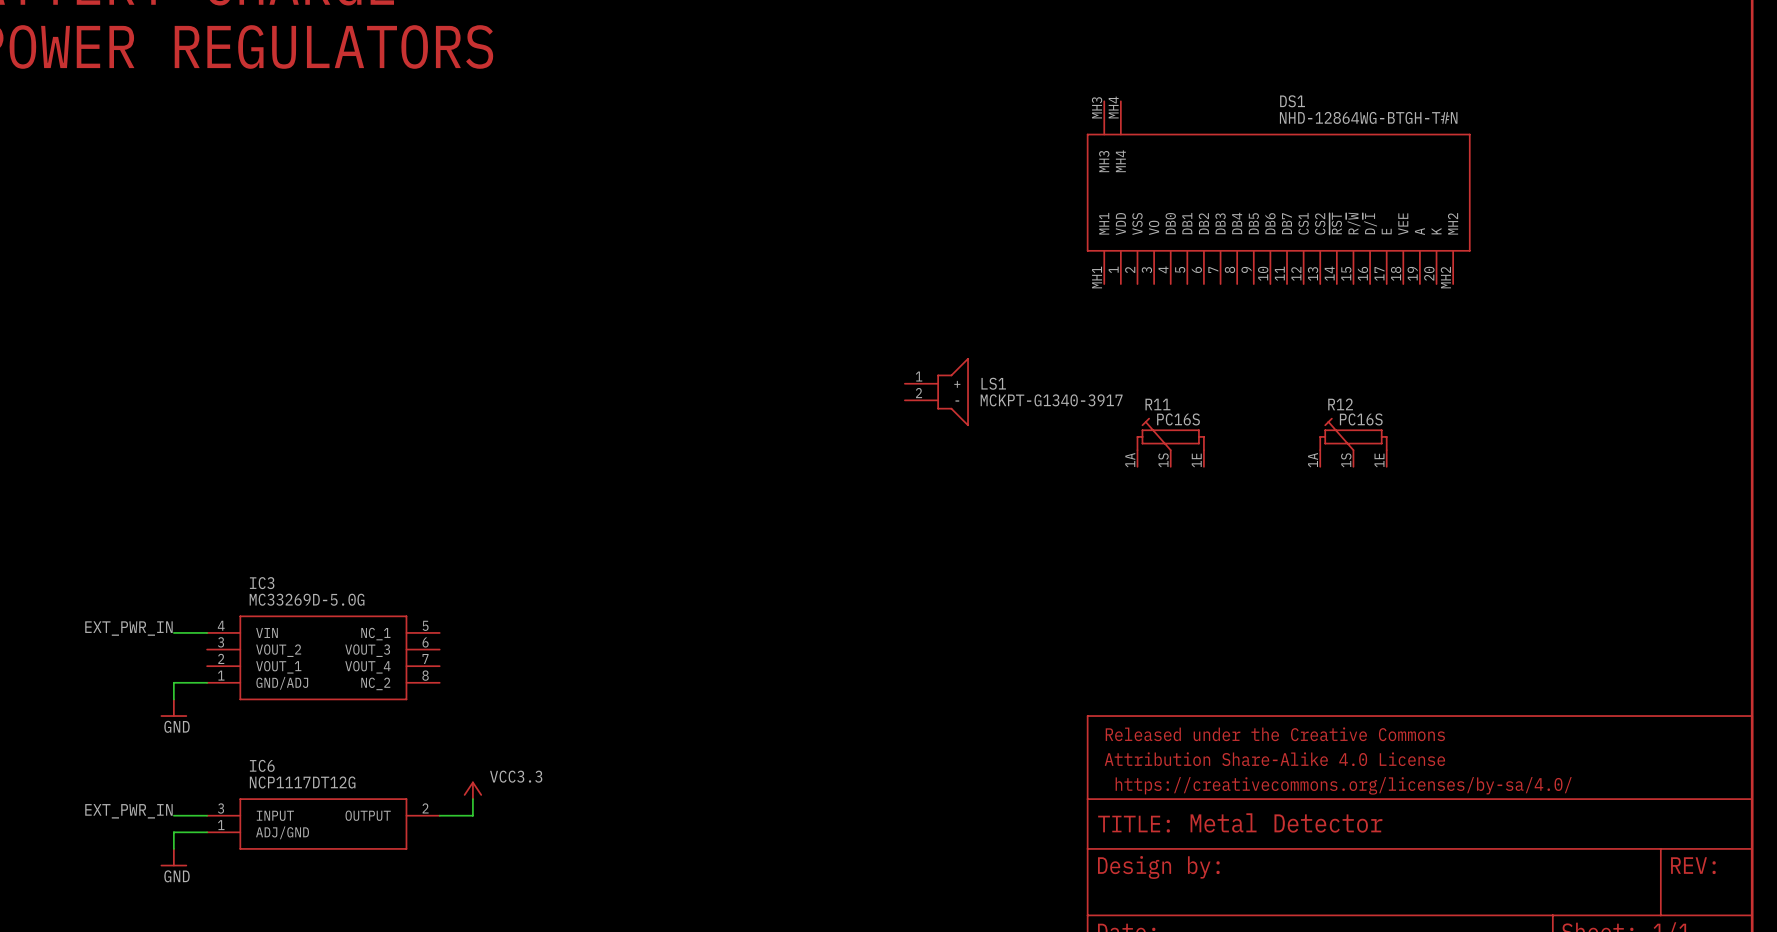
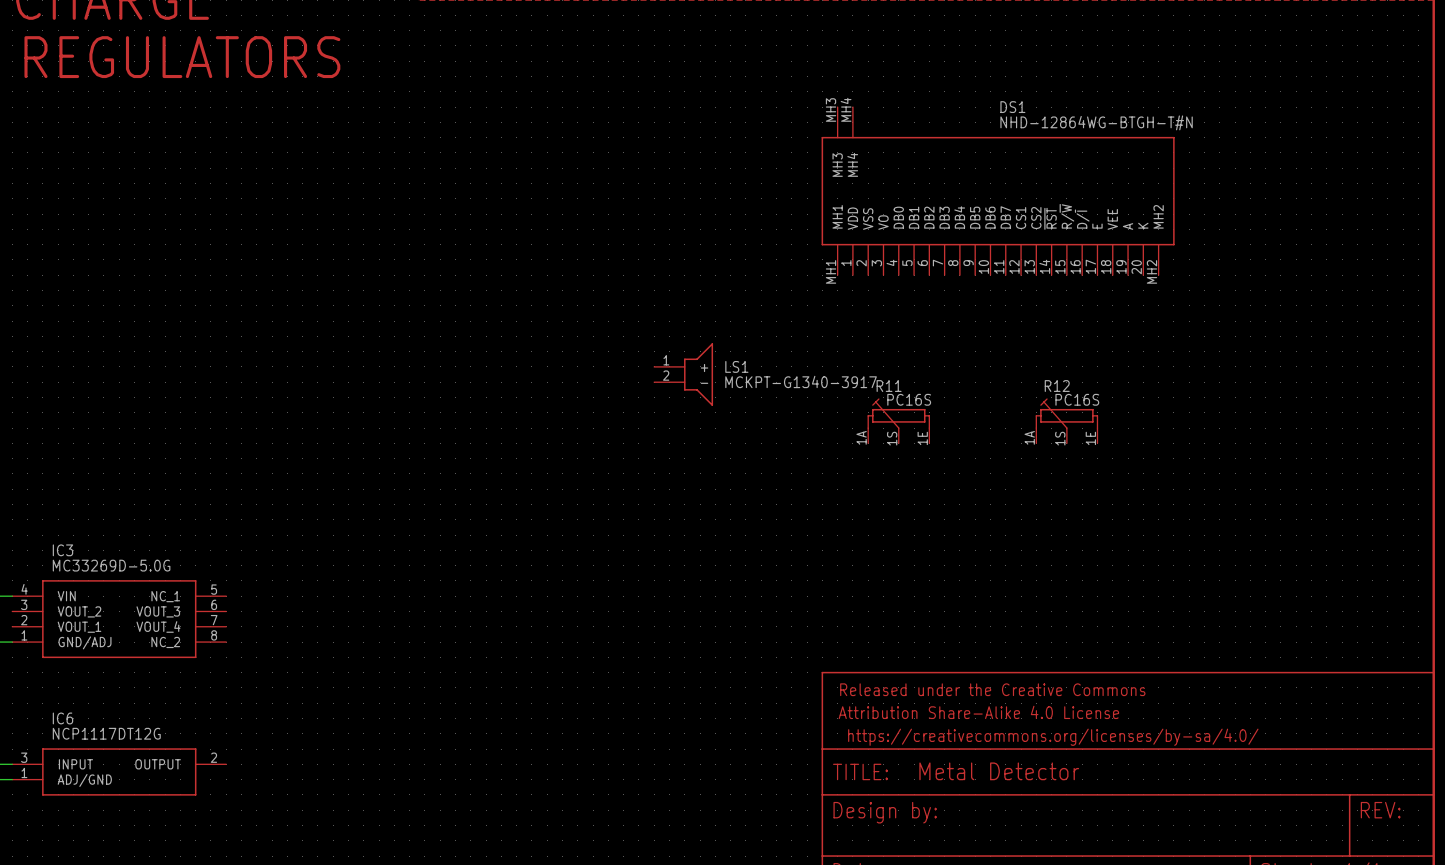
power symbol: VCC3.3 (472, 790) -> none
wire: (472, 799) (472, 815) (439, 815) -> none

